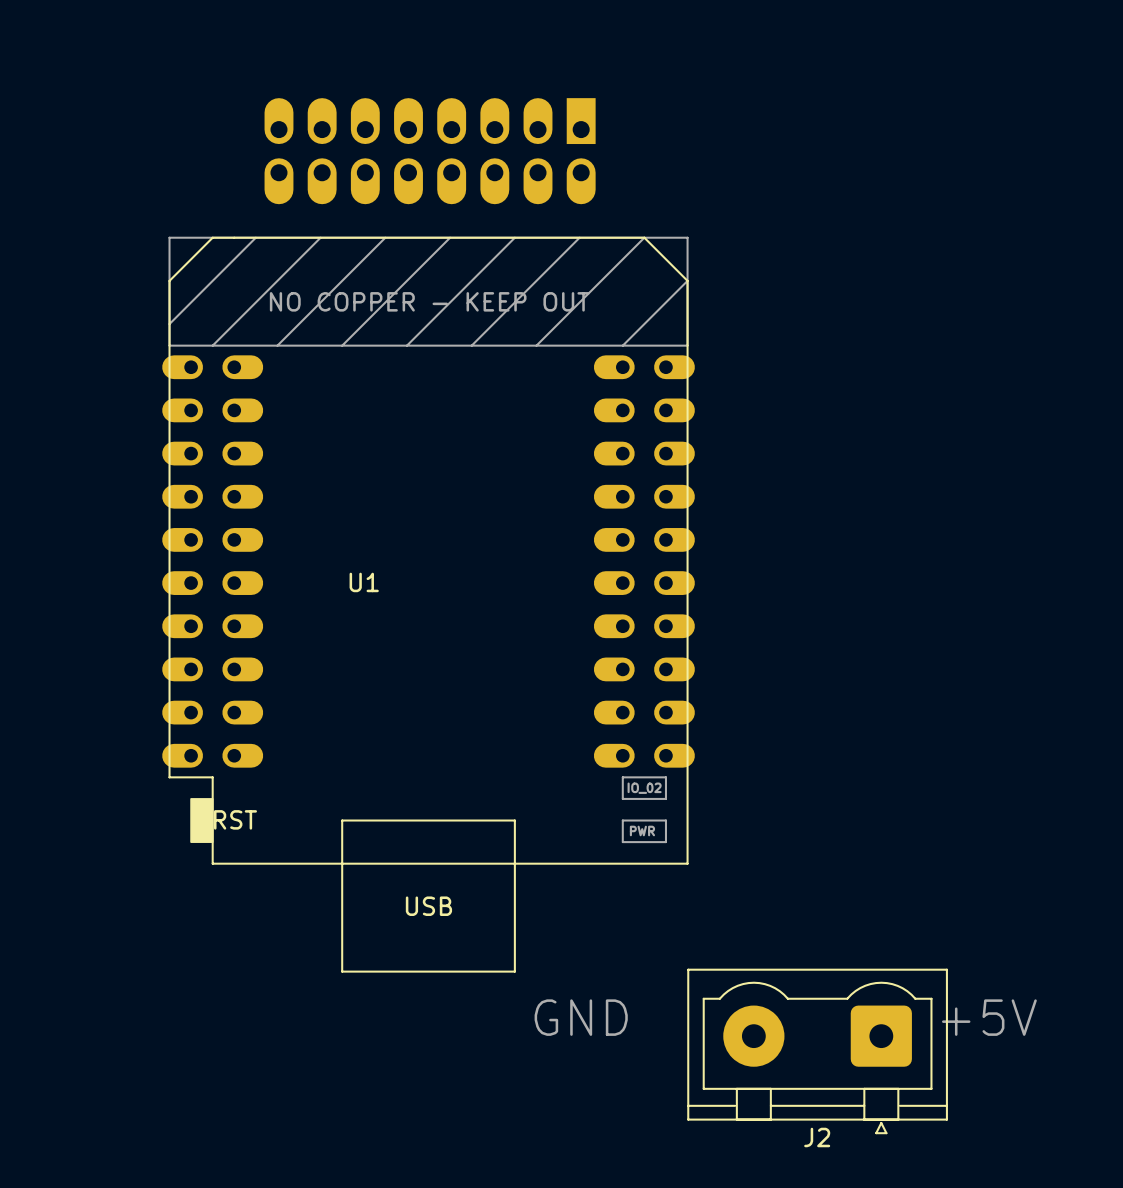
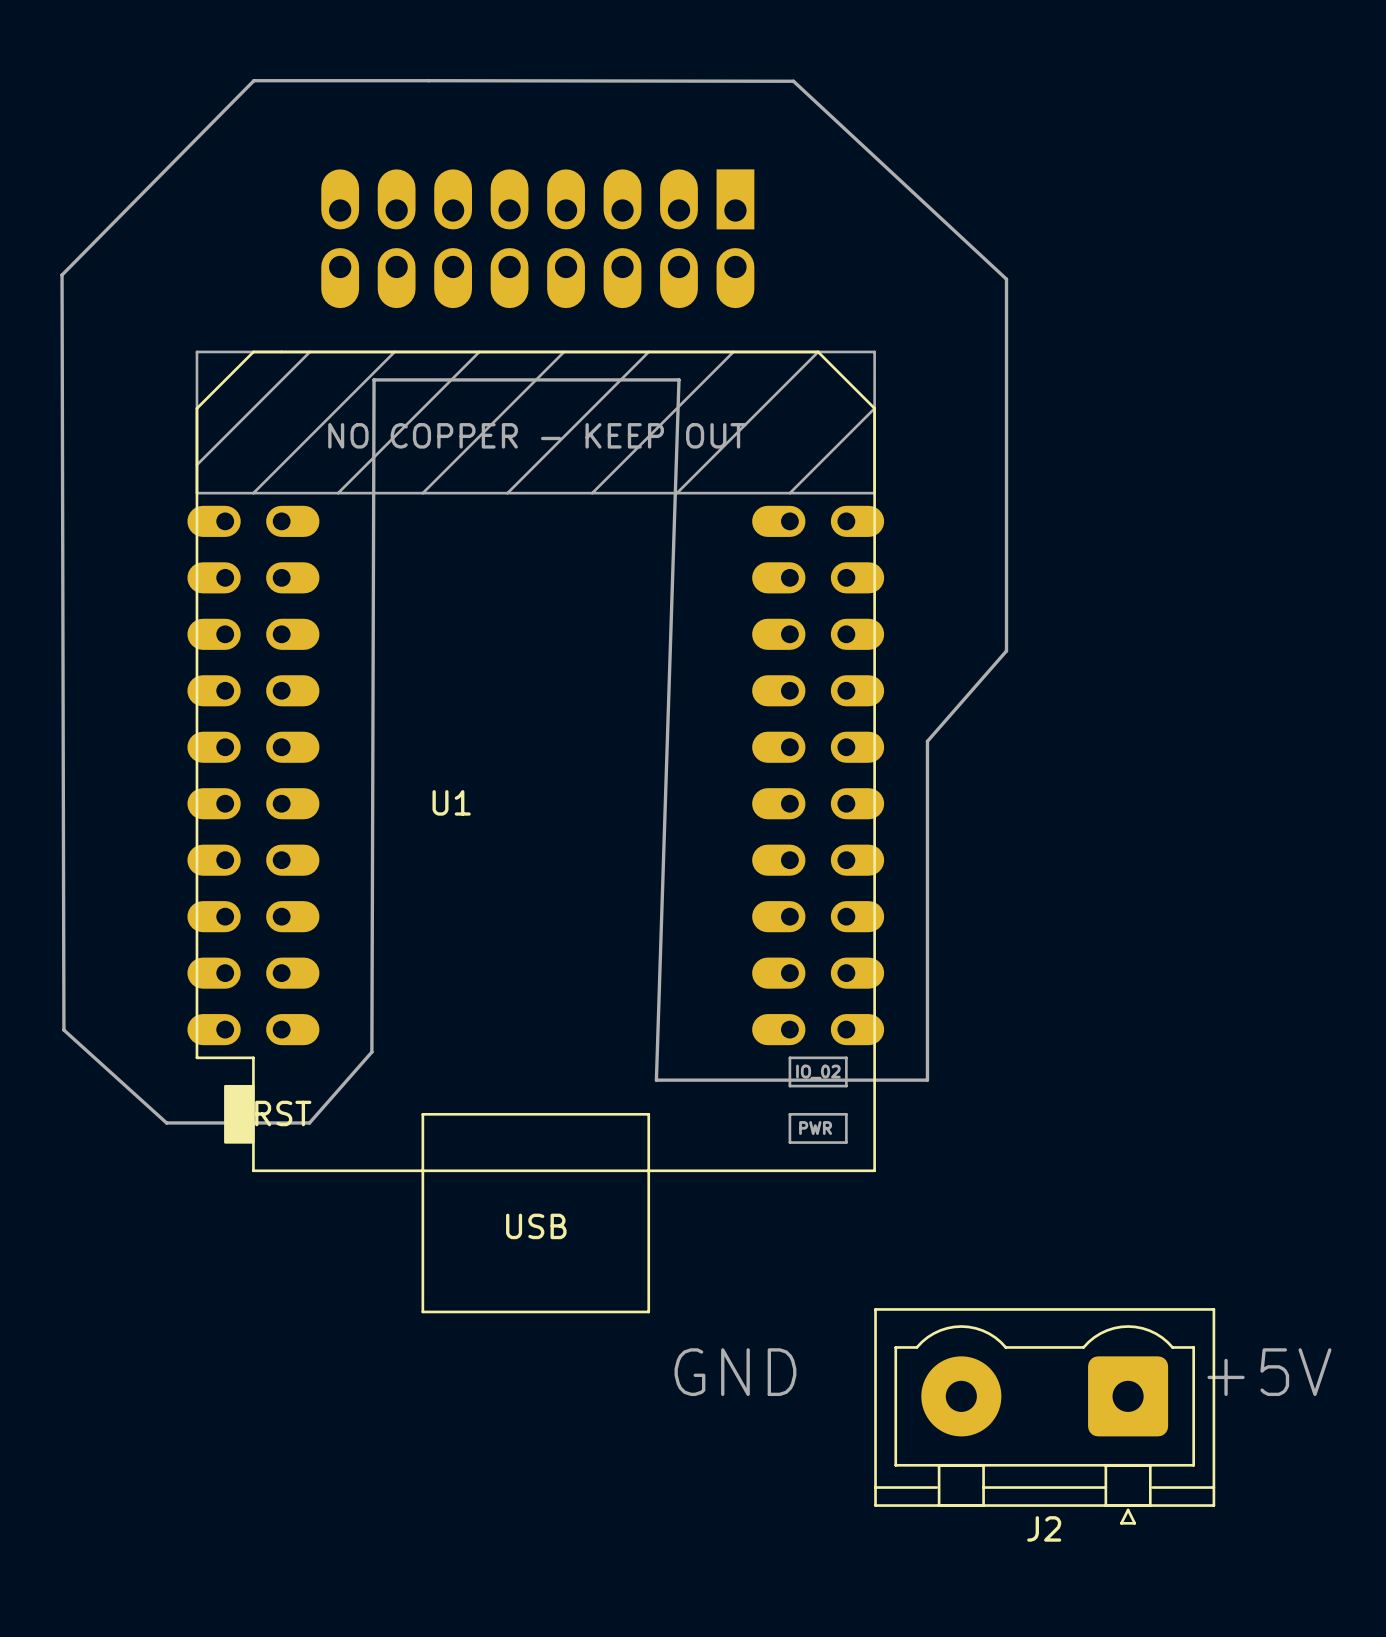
line: none -> (253, 80) (62, 275) (63, 1030) (166, 1122) (309, 1122) (371, 1052) (374, 379) (678, 379) (656, 1080) (927, 1080) (927, 741) (1006, 650) (1006, 279) (793, 81) (253, 80)

